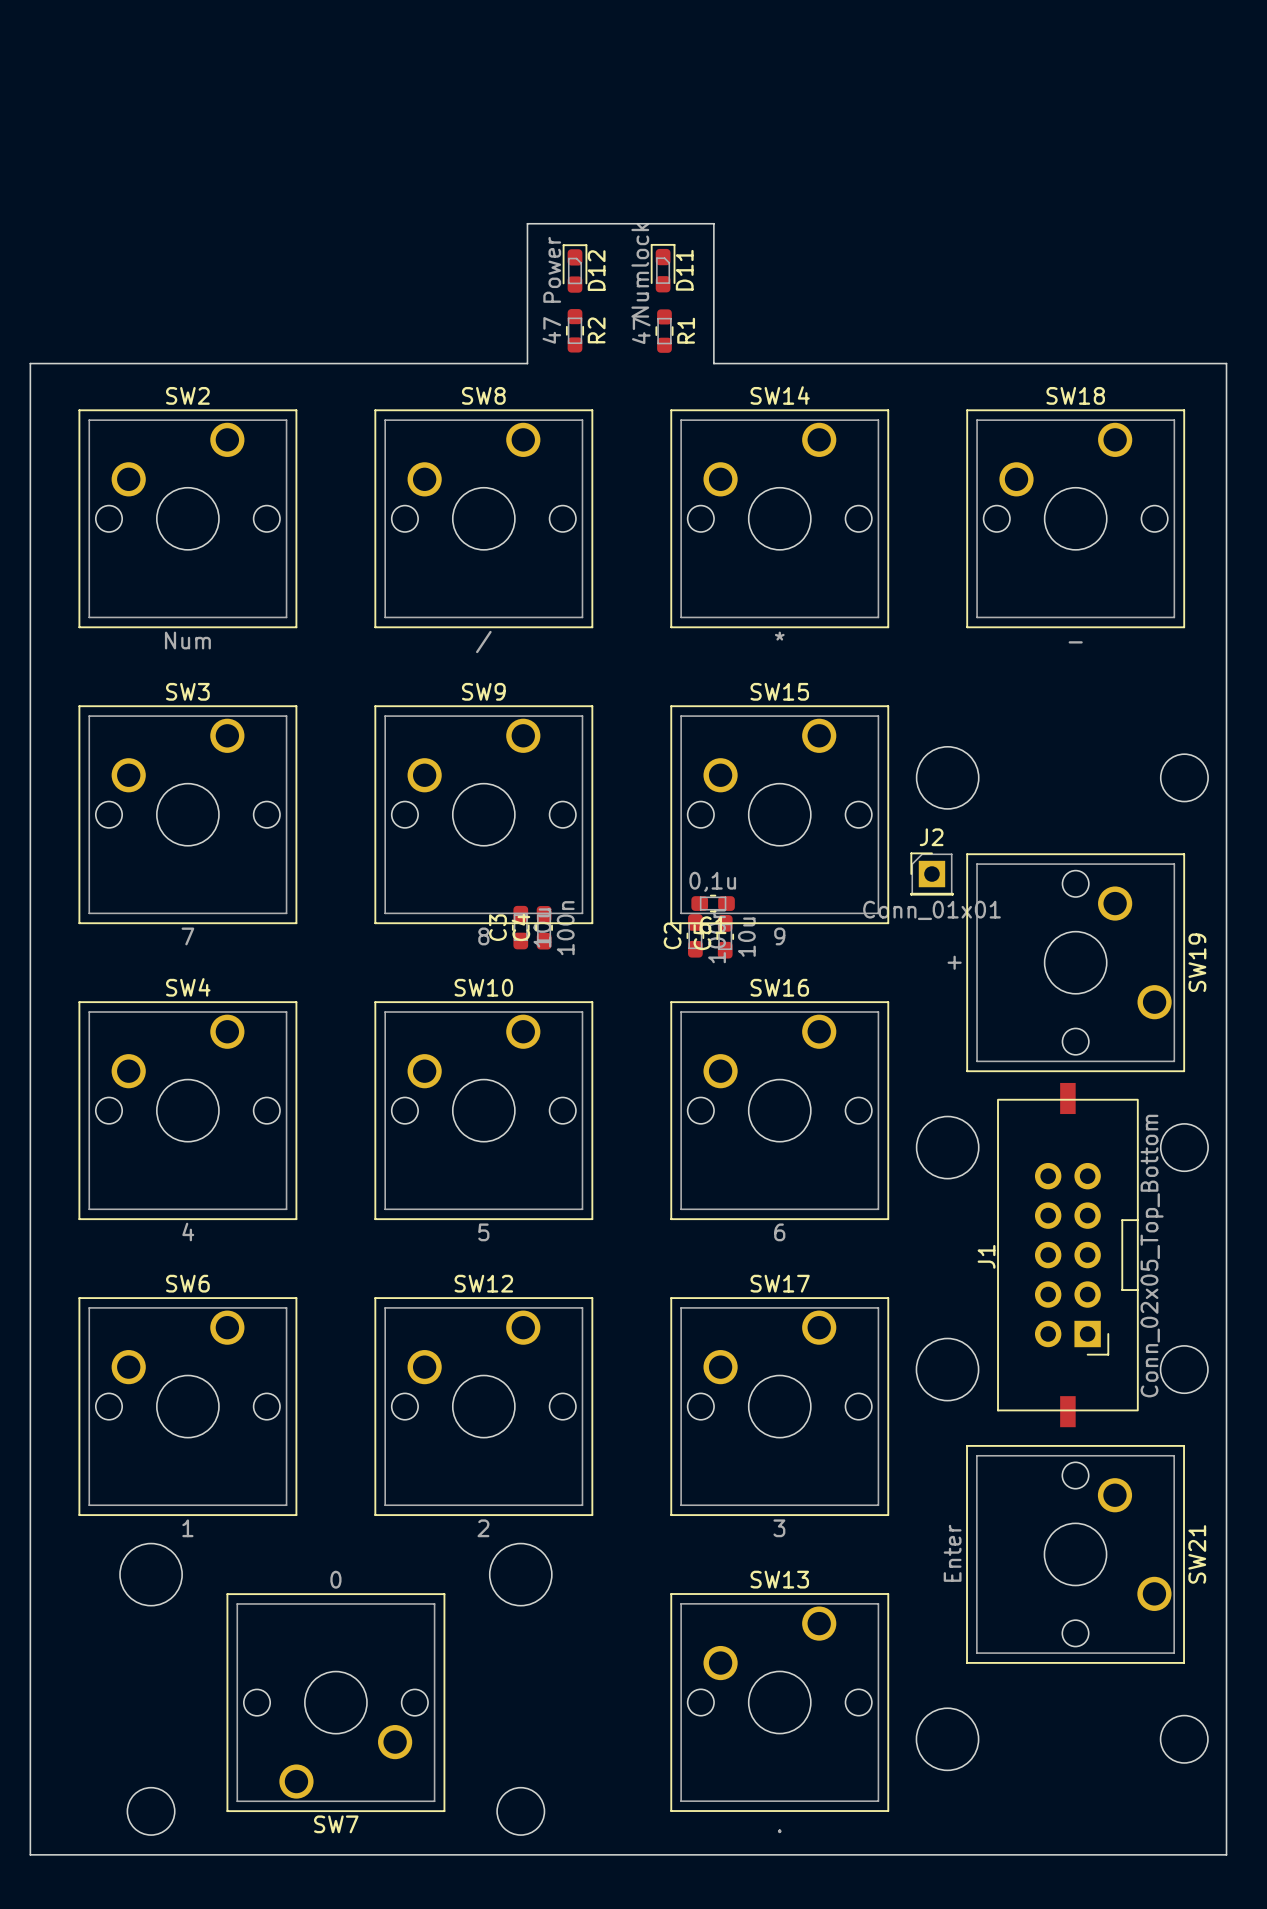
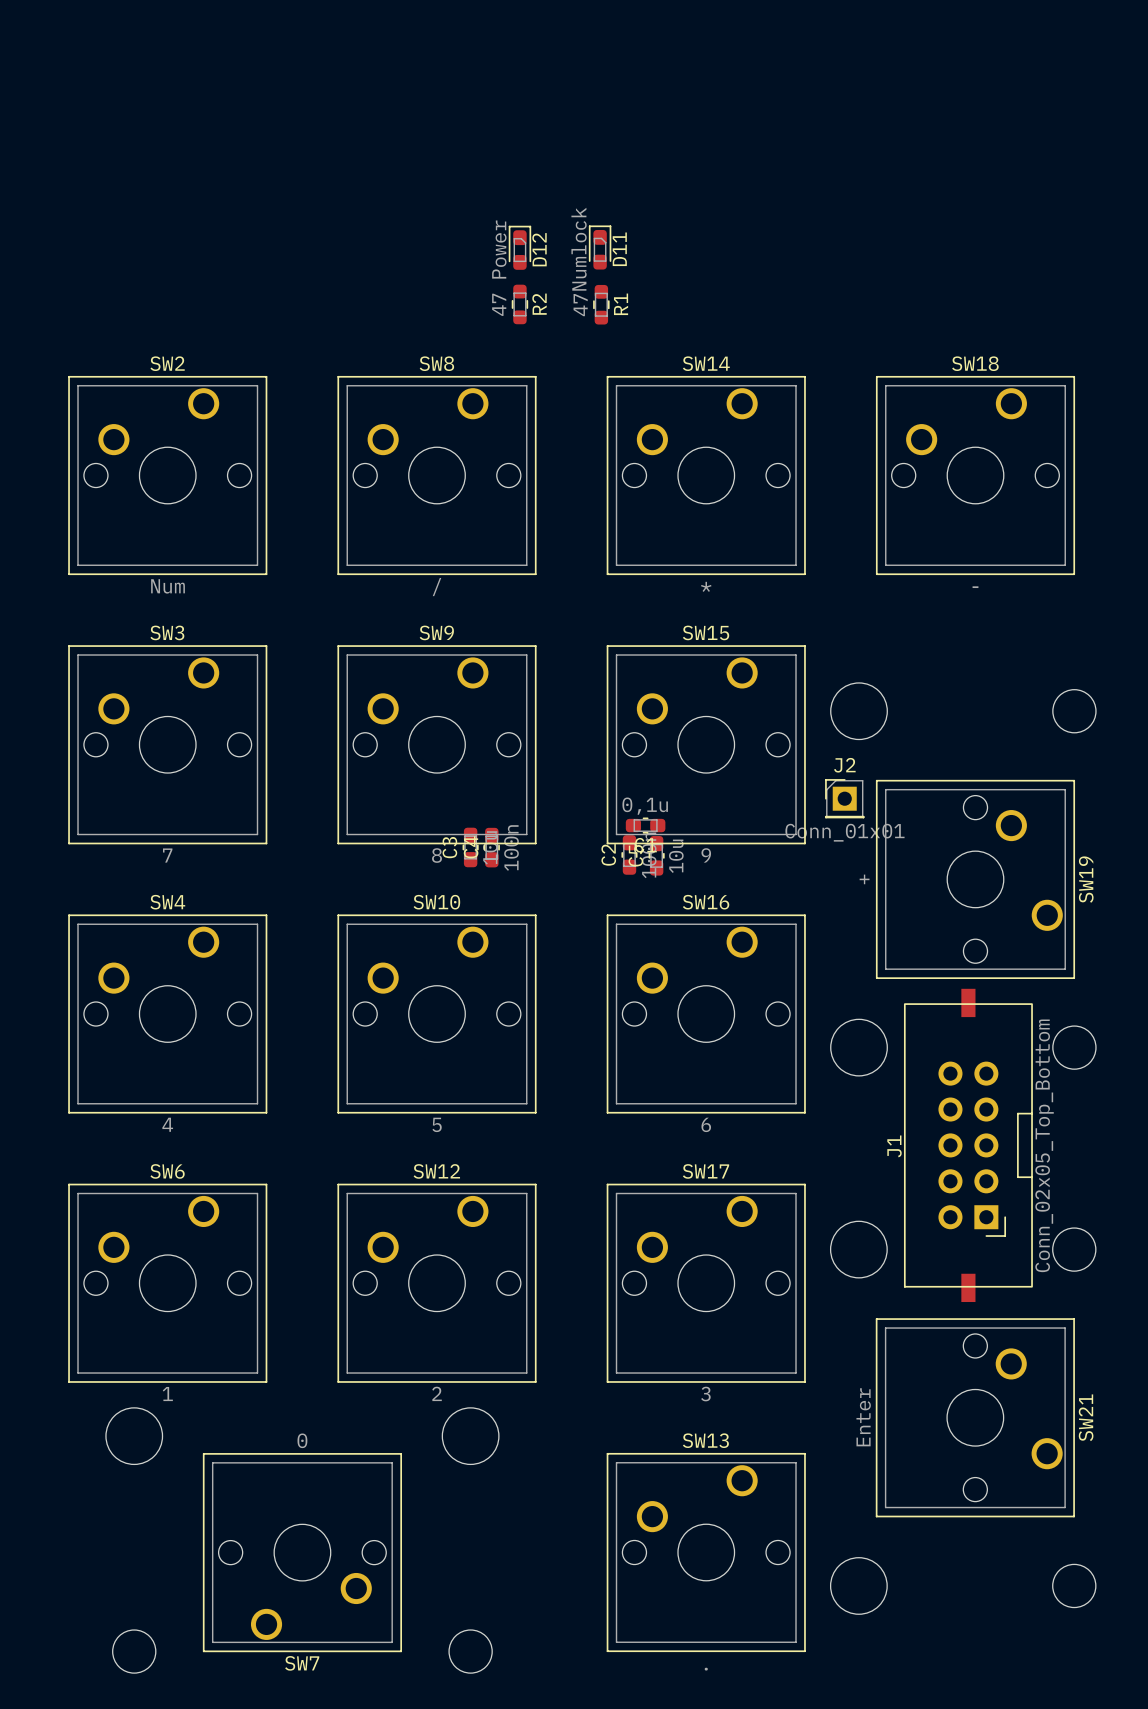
board edge: (527, 223) (713, 223) (713, 363) (1226, 363) (1226, 1854) (30, 1854) (30, 363) (527, 363) (527, 223) -> none

